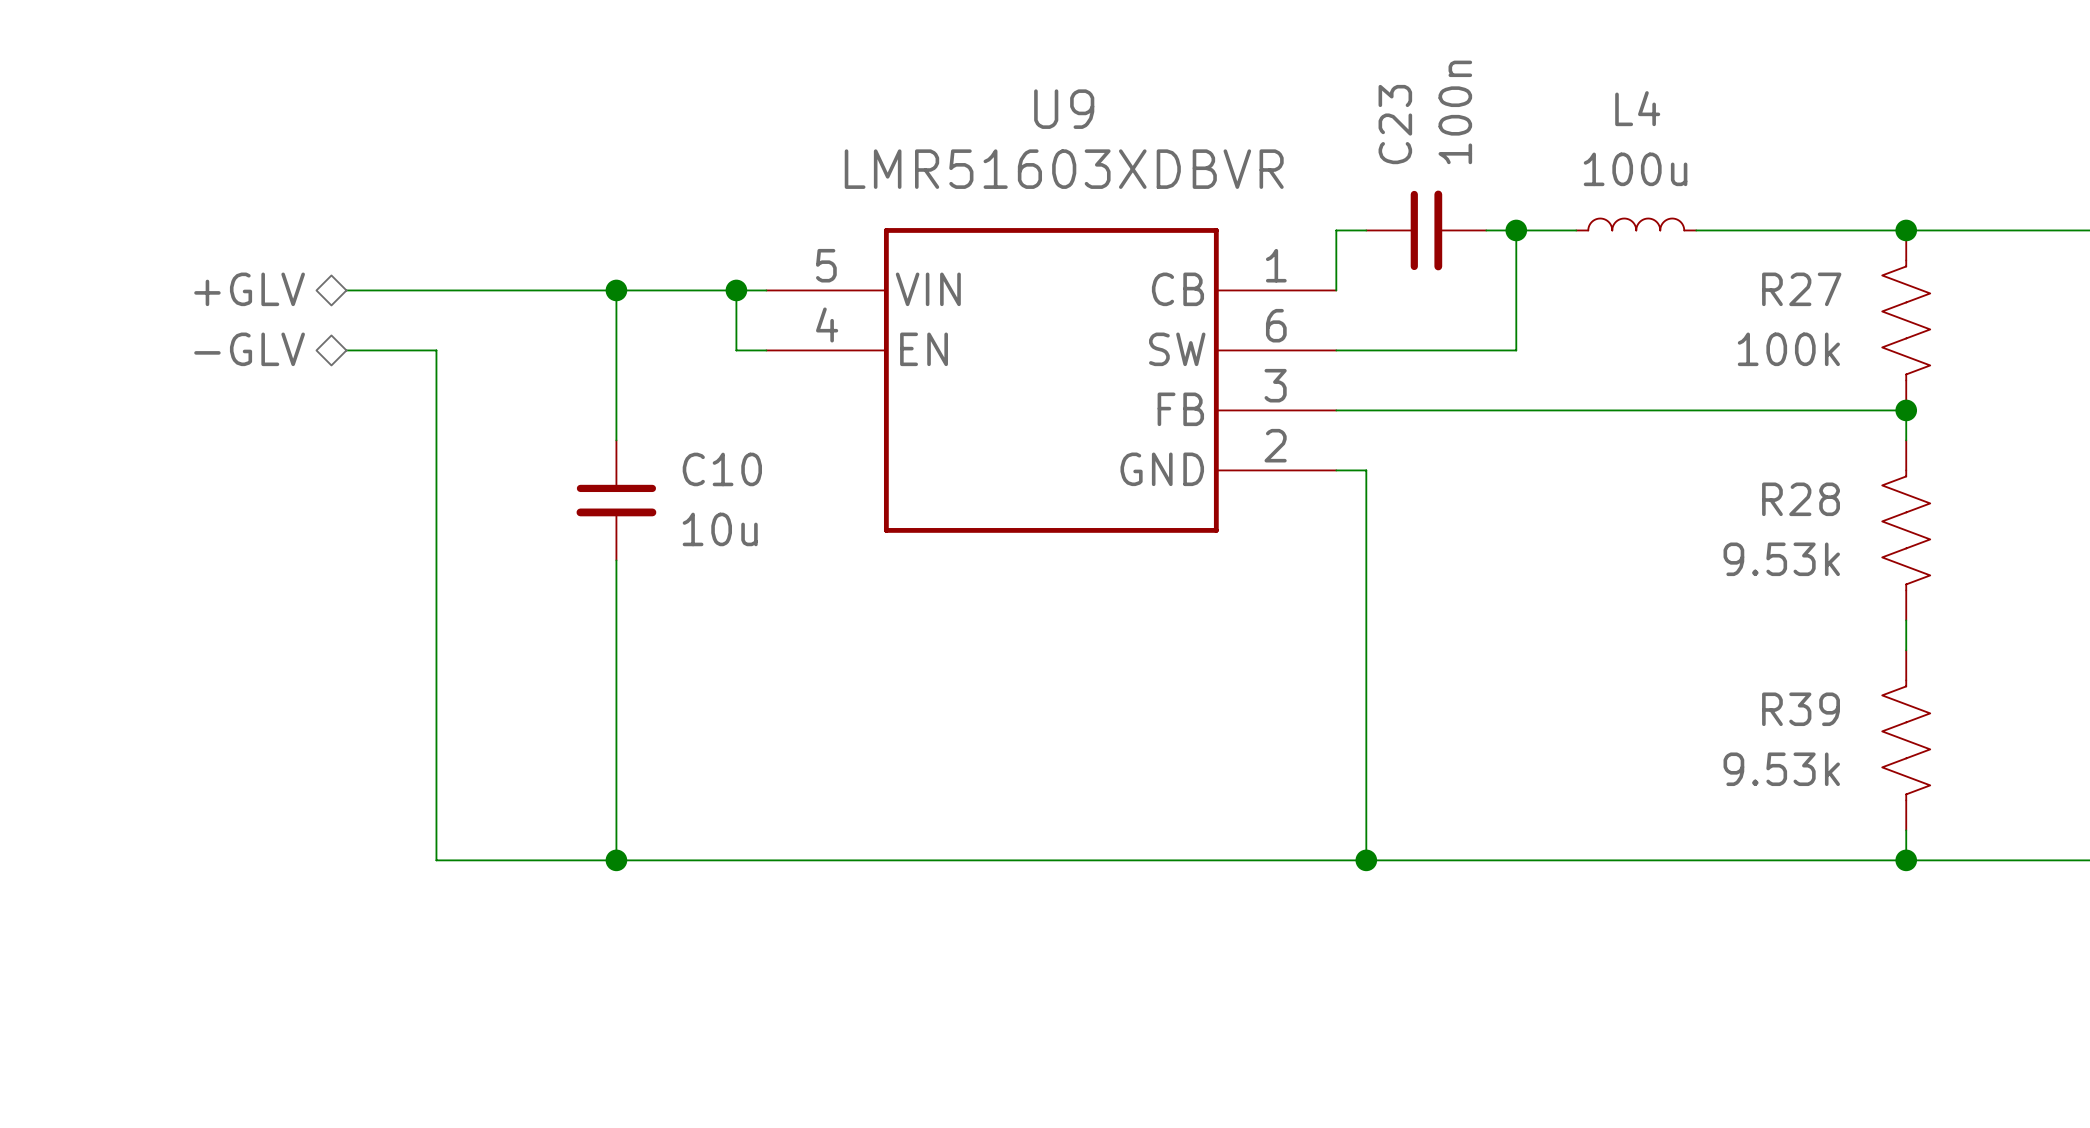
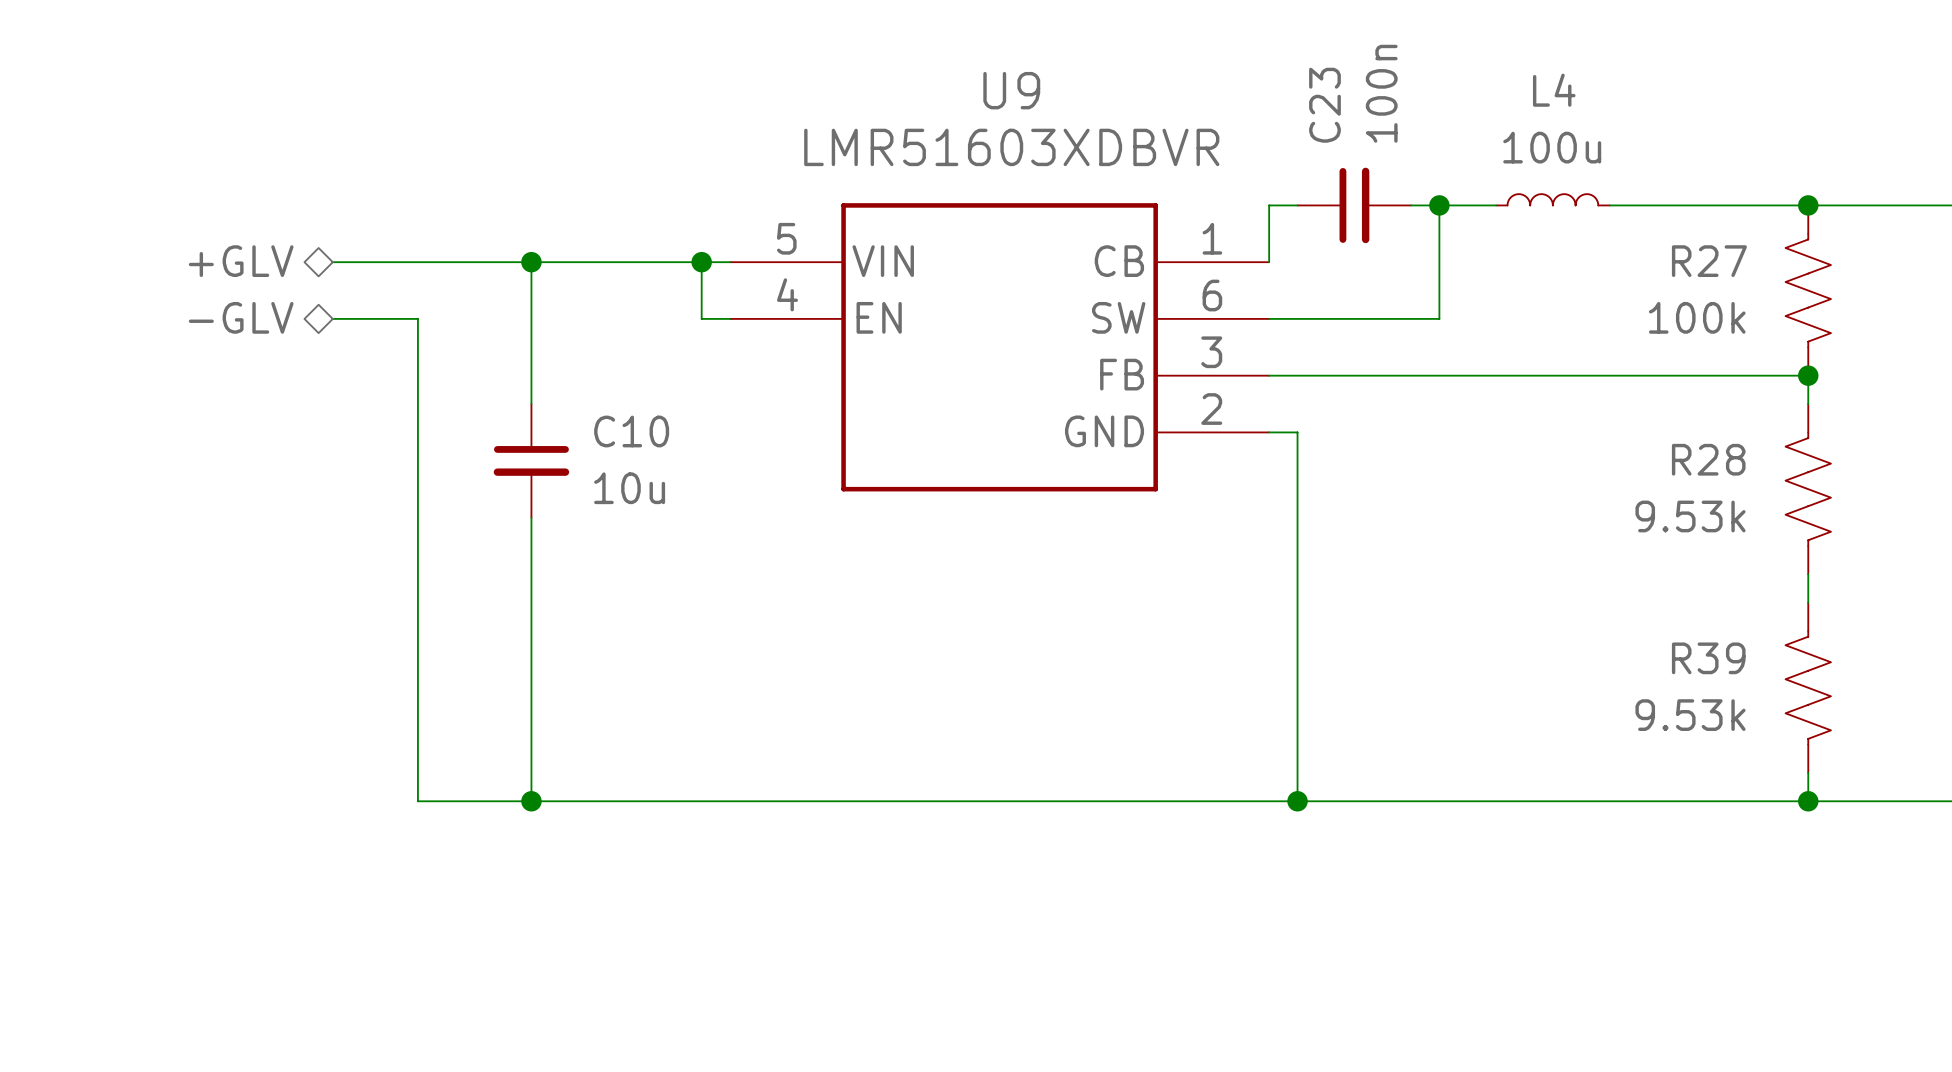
wire: (616, 290) (616, 440) -> (531, 262) (531, 404)
junction position: (616, 290) -> (531, 262)
C10 position: (616, 500) -> (531, 460)
wire: (616, 560) (616, 860) -> (531, 517) (531, 801)
junction position: (616, 860) -> (531, 801)

